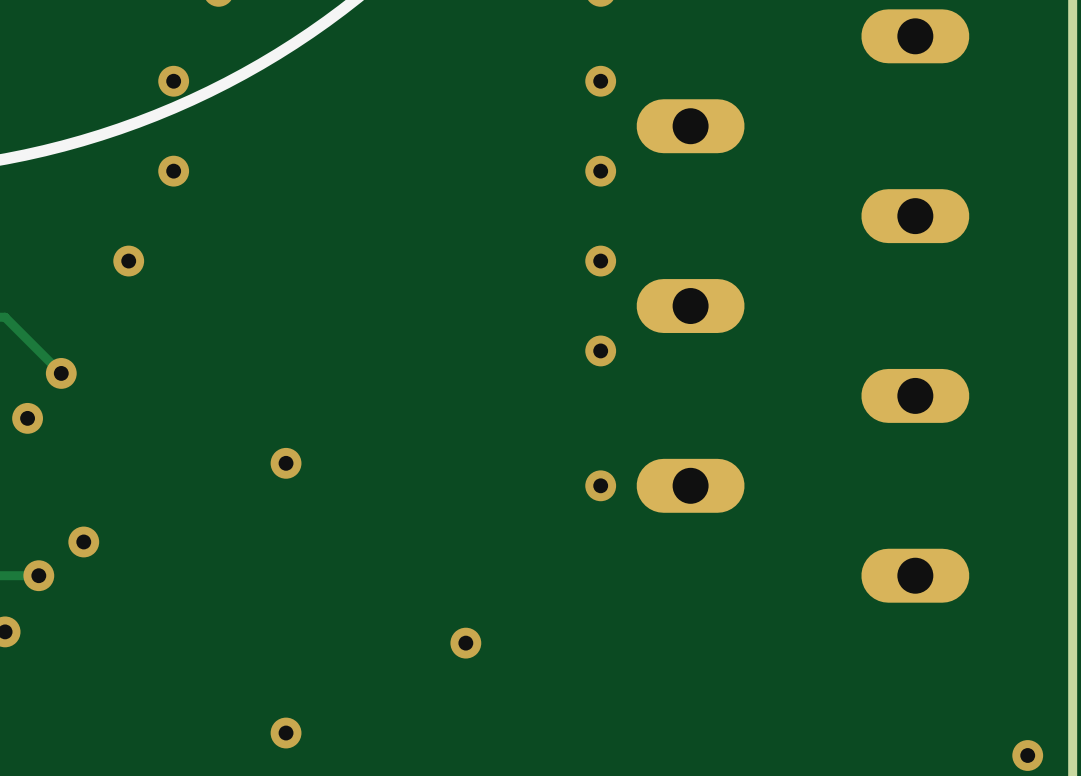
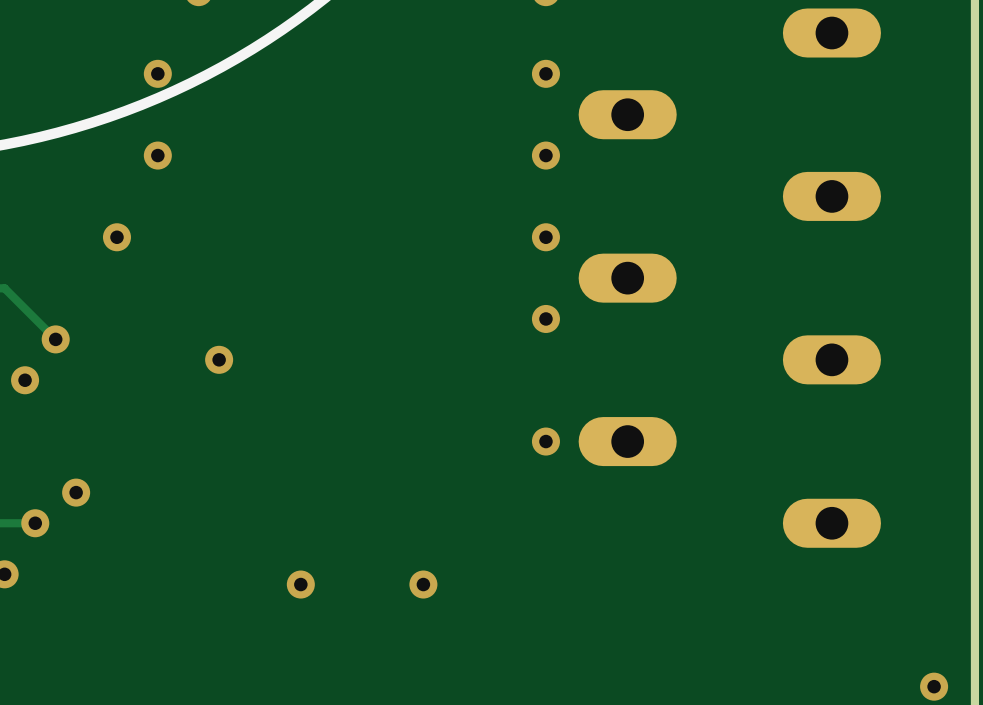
via position: (286, 463) -> (219, 359)
via: none -> (300, 584)
via: (286, 733) -> none

